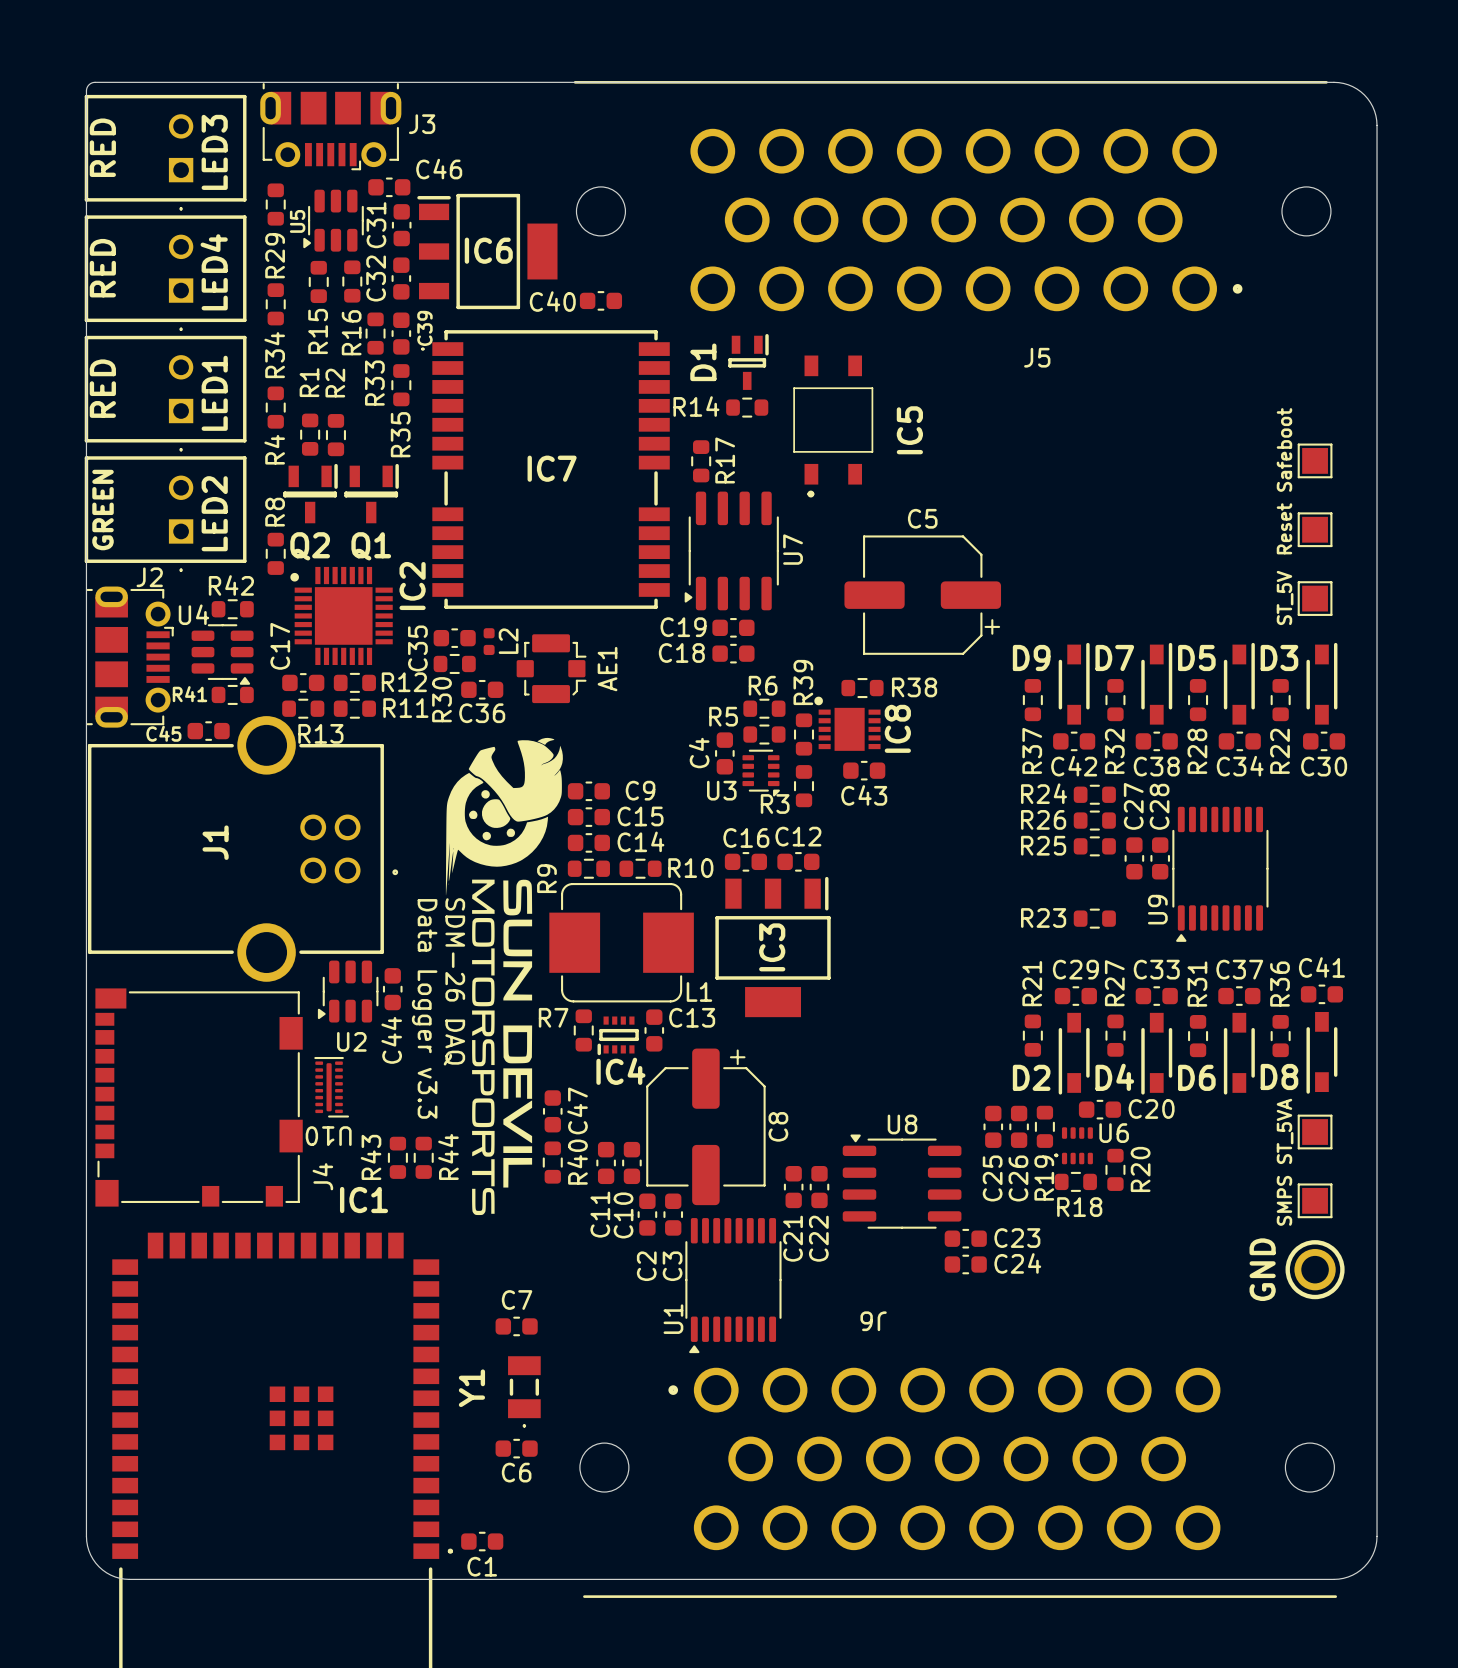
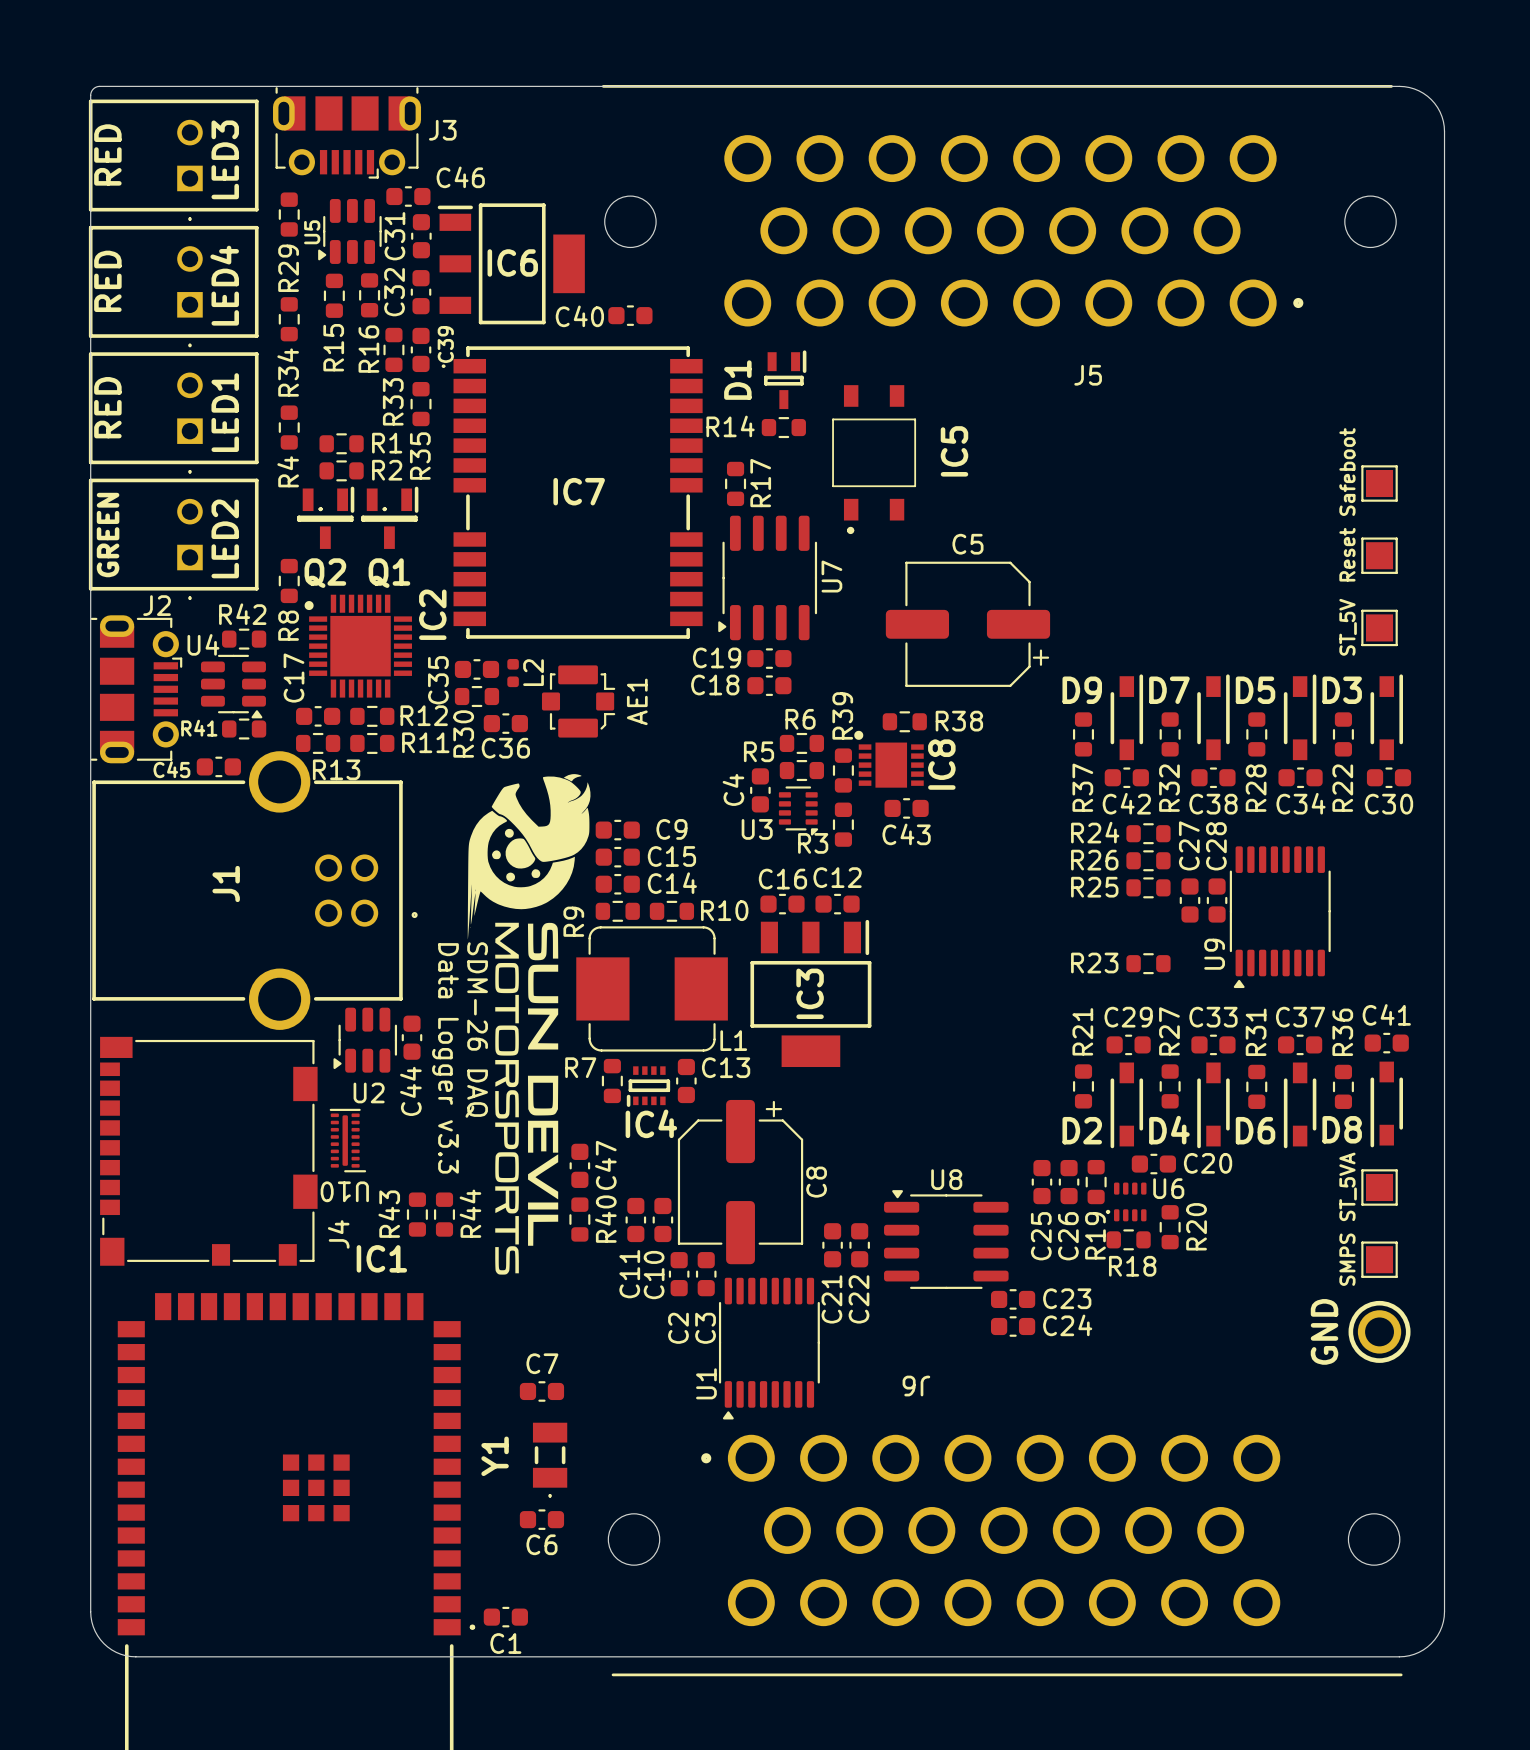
IC5 footprint: [793, 355, 874, 498] -> [832, 385, 917, 535]
R1 rotation: 0° (310, 434) -> 90° clockwise (341, 443)
R2 rotation: 0° (335, 435) -> 90° clockwise (341, 470)
Q2 text: none -> . (320, 509)
Q1 text: none -> . (384, 509)
R8 name position: R8 (275, 512) -> R8 (288, 625)

